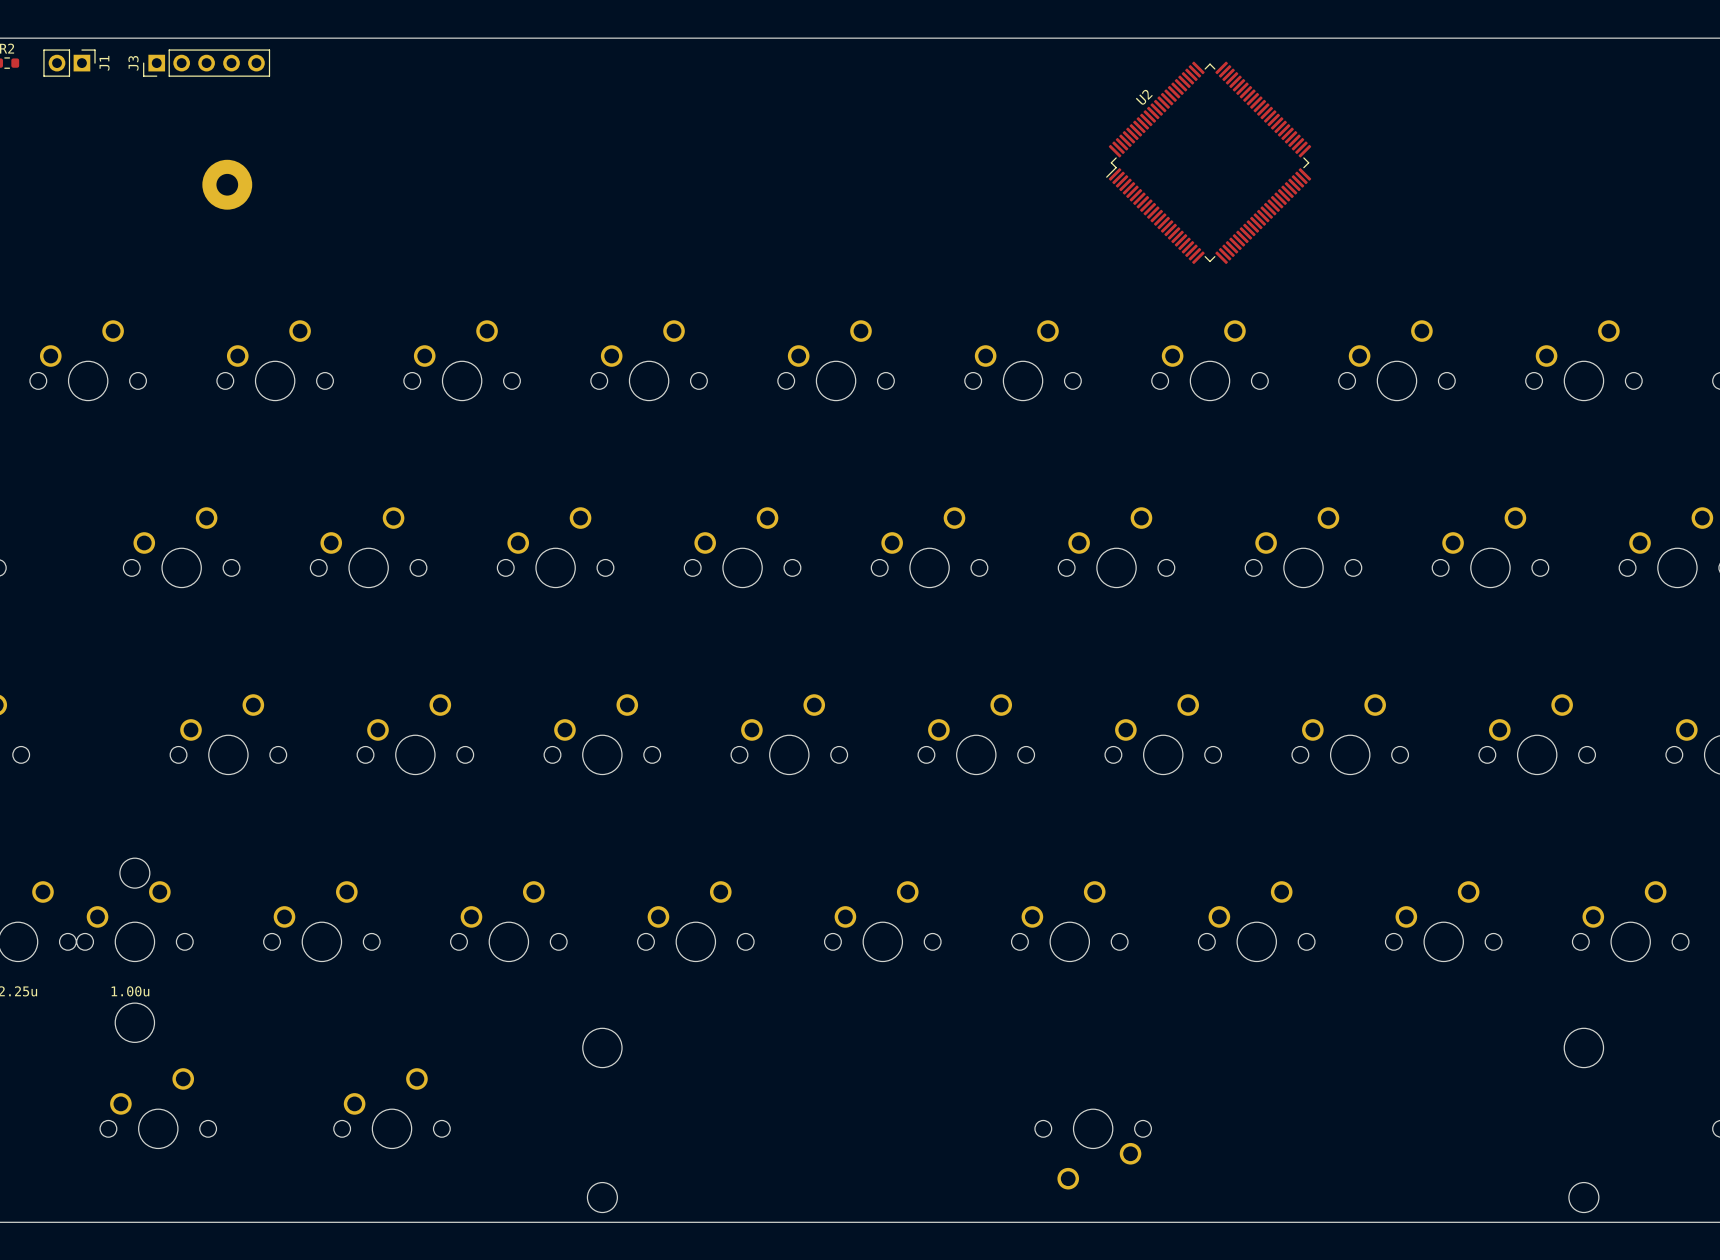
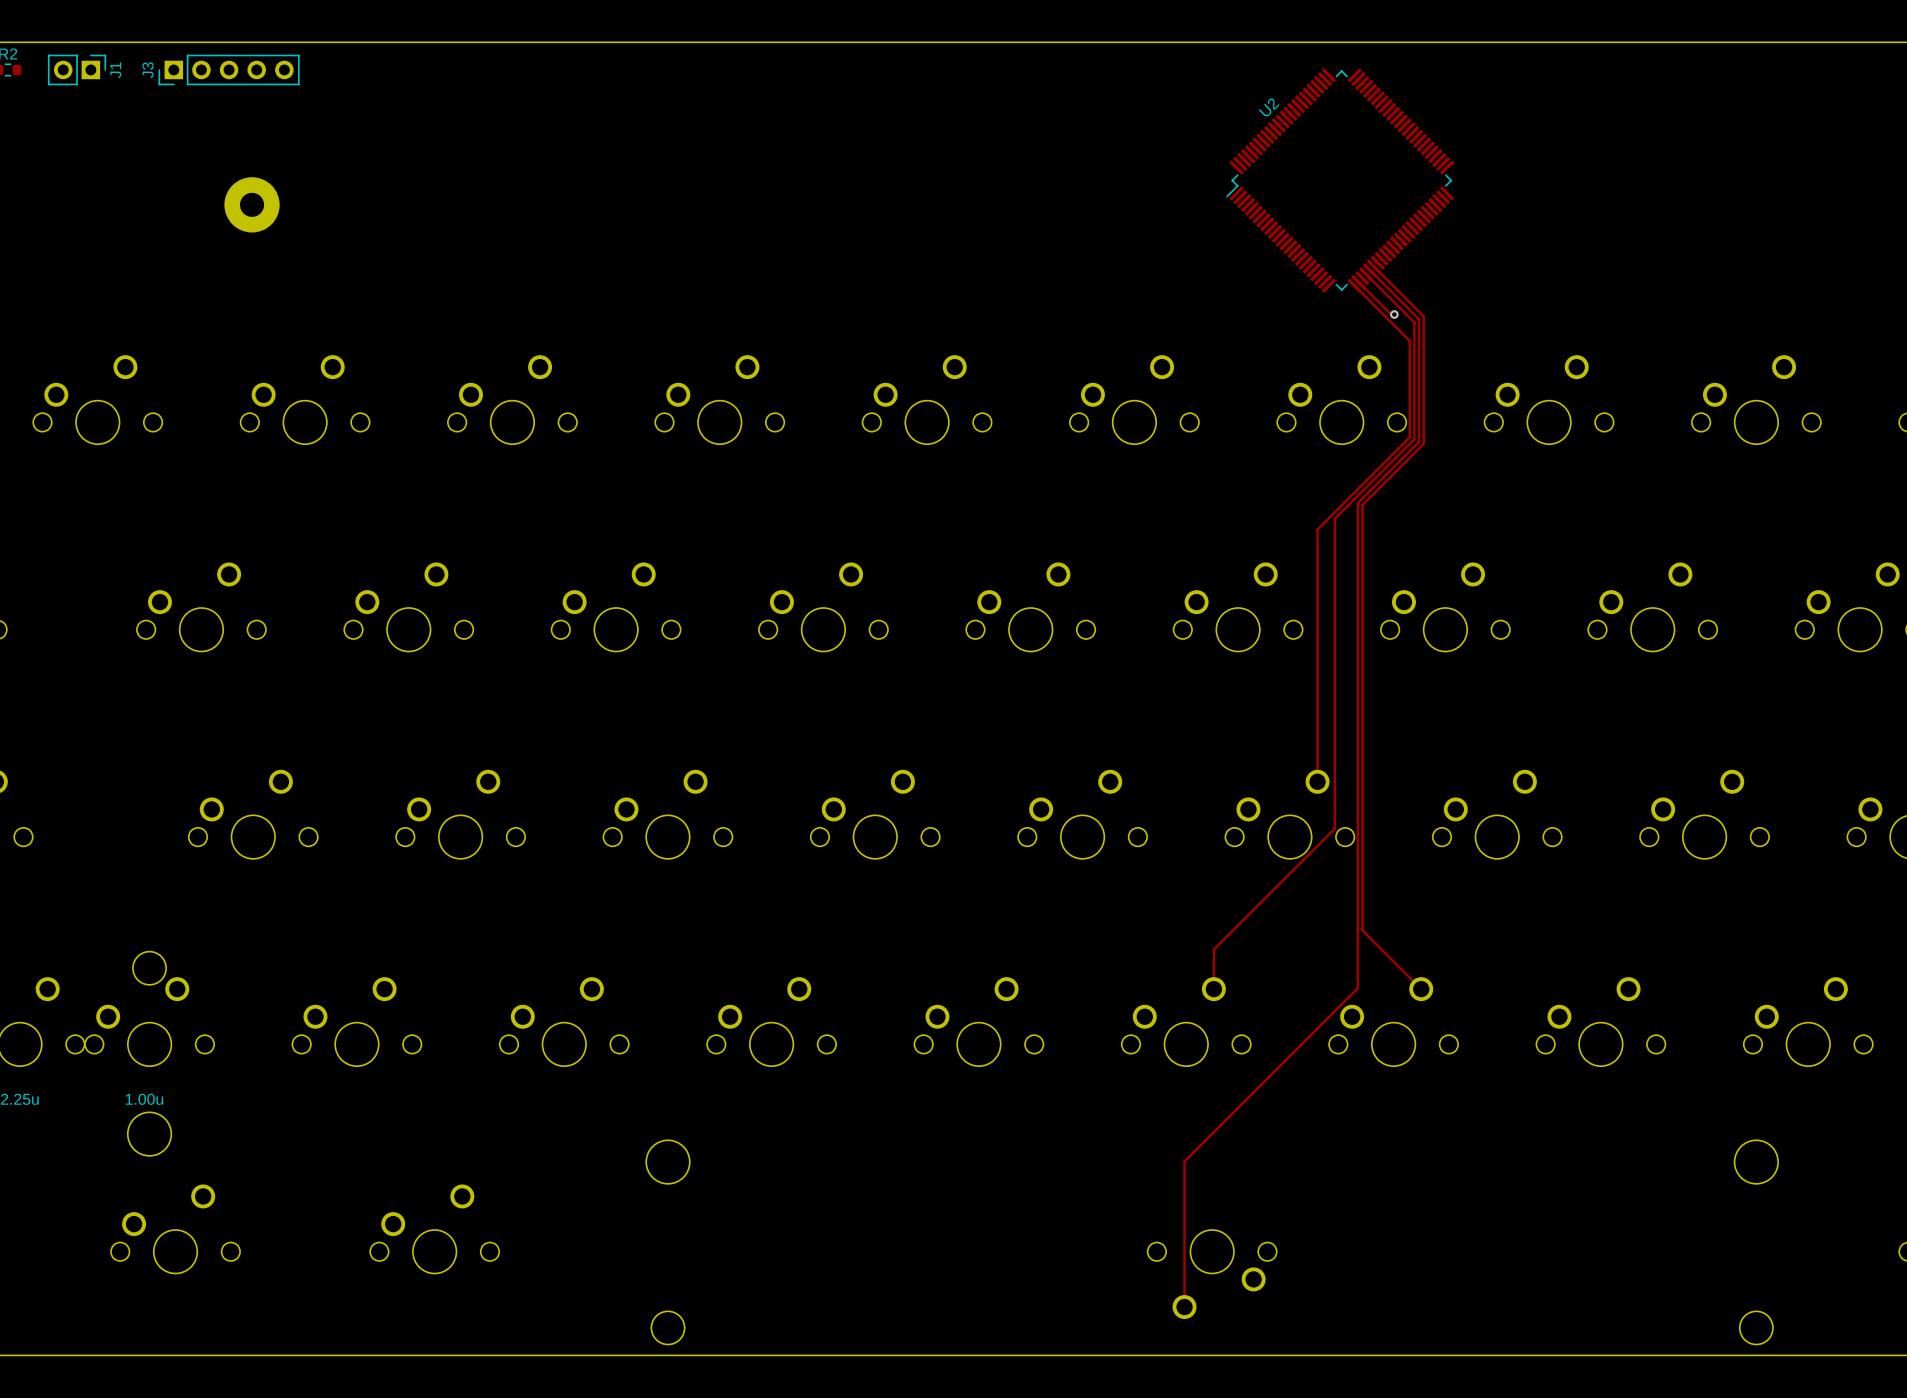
top track: none -> (1373, 266) (1423, 316) (1423, 443) (1362, 504) (1362, 930) (1421, 989)
top track: none -> (1370, 270) (1419, 319) (1419, 441) (1357, 503) (1357, 988) (1184, 1161) (1184, 1307)
top track: none -> (1366, 274) (1414, 322) (1414, 439) (1334, 518) (1334, 828) (1213, 949) (1213, 989)
top track: none -> (1358, 281) (1391, 314) (1394, 314)
top track: none -> (1354, 285) (1409, 340) (1409, 437) (1317, 529) (1317, 781)
via: none -> (1394, 314)

